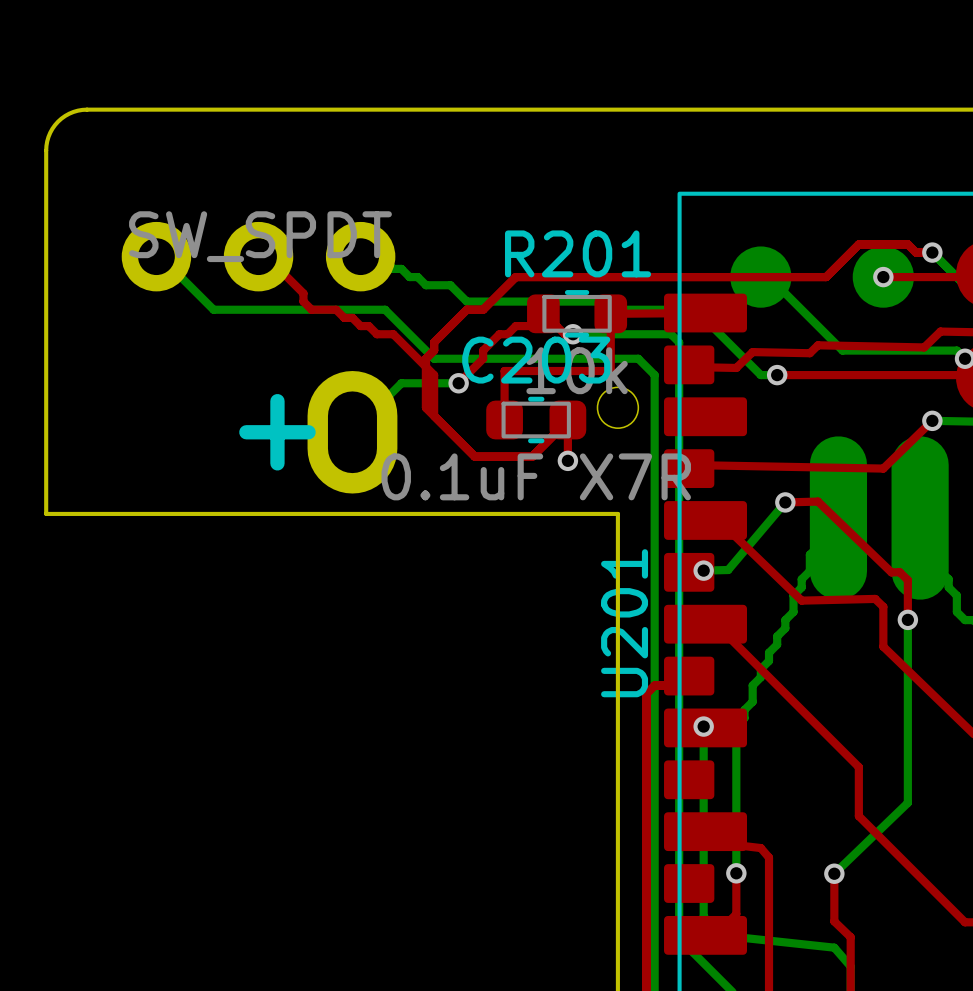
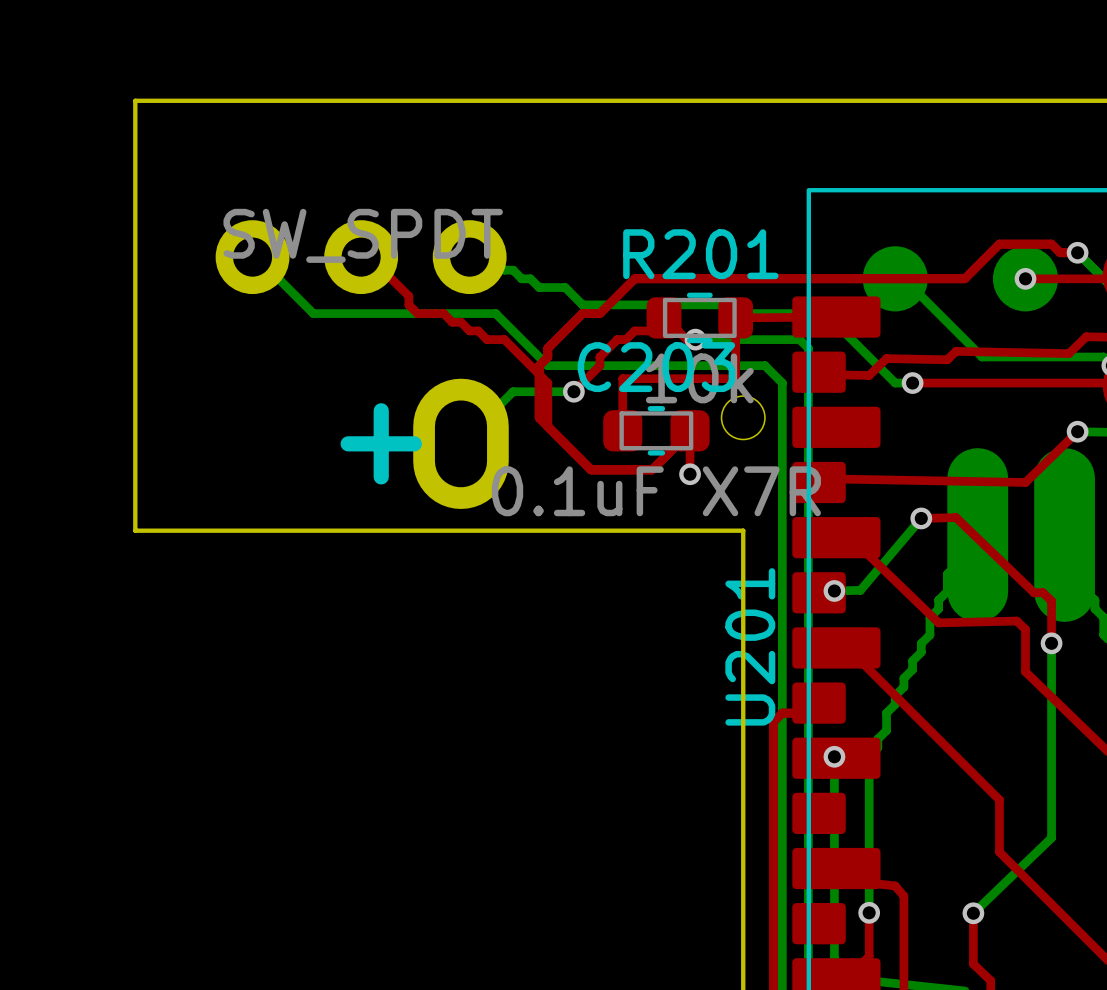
board edge: (87, 109) (73, 111) (58, 121) (50, 132) (46, 150) -> (178, 100) (135, 100) (135, 144)

